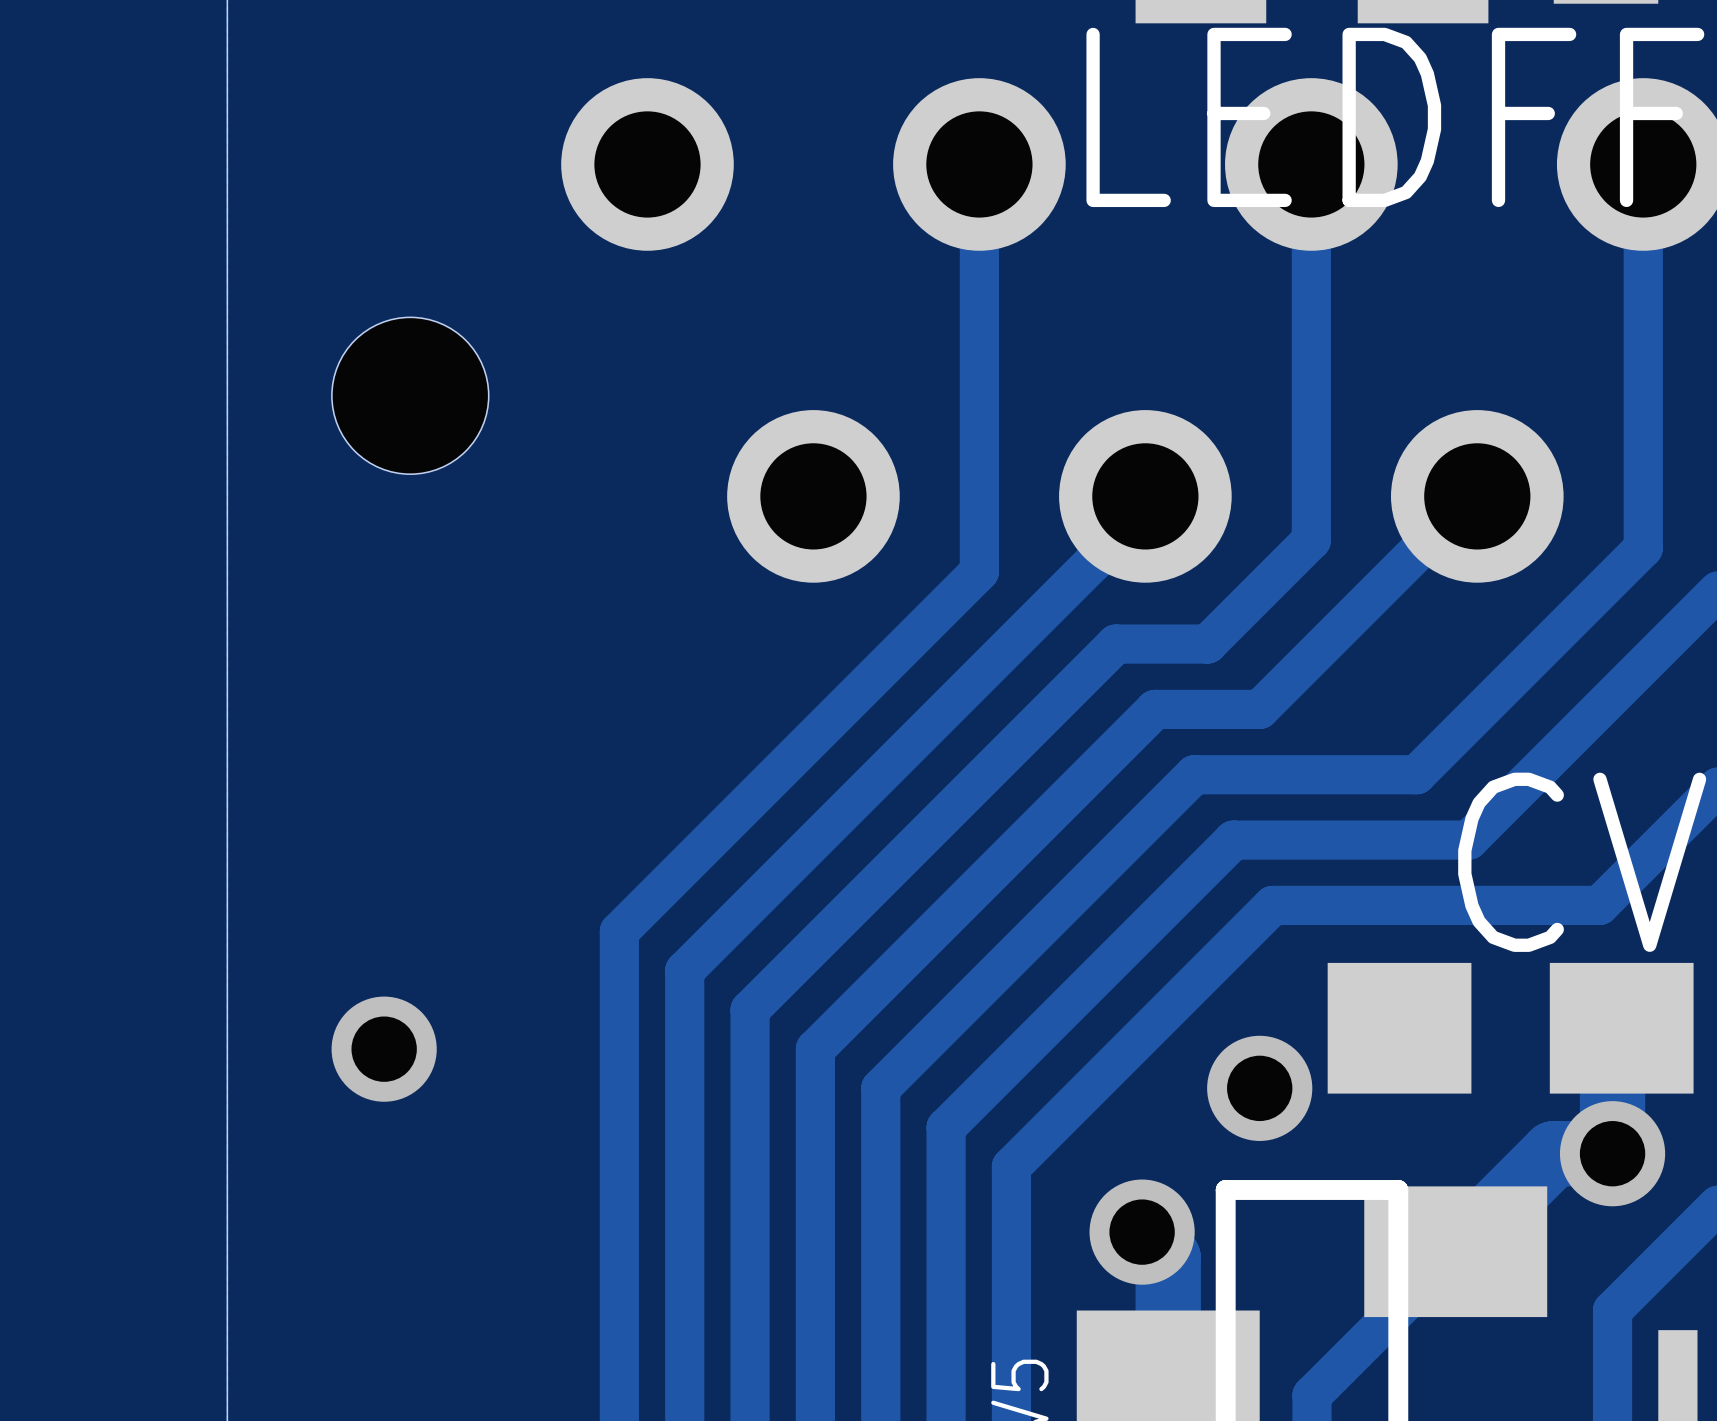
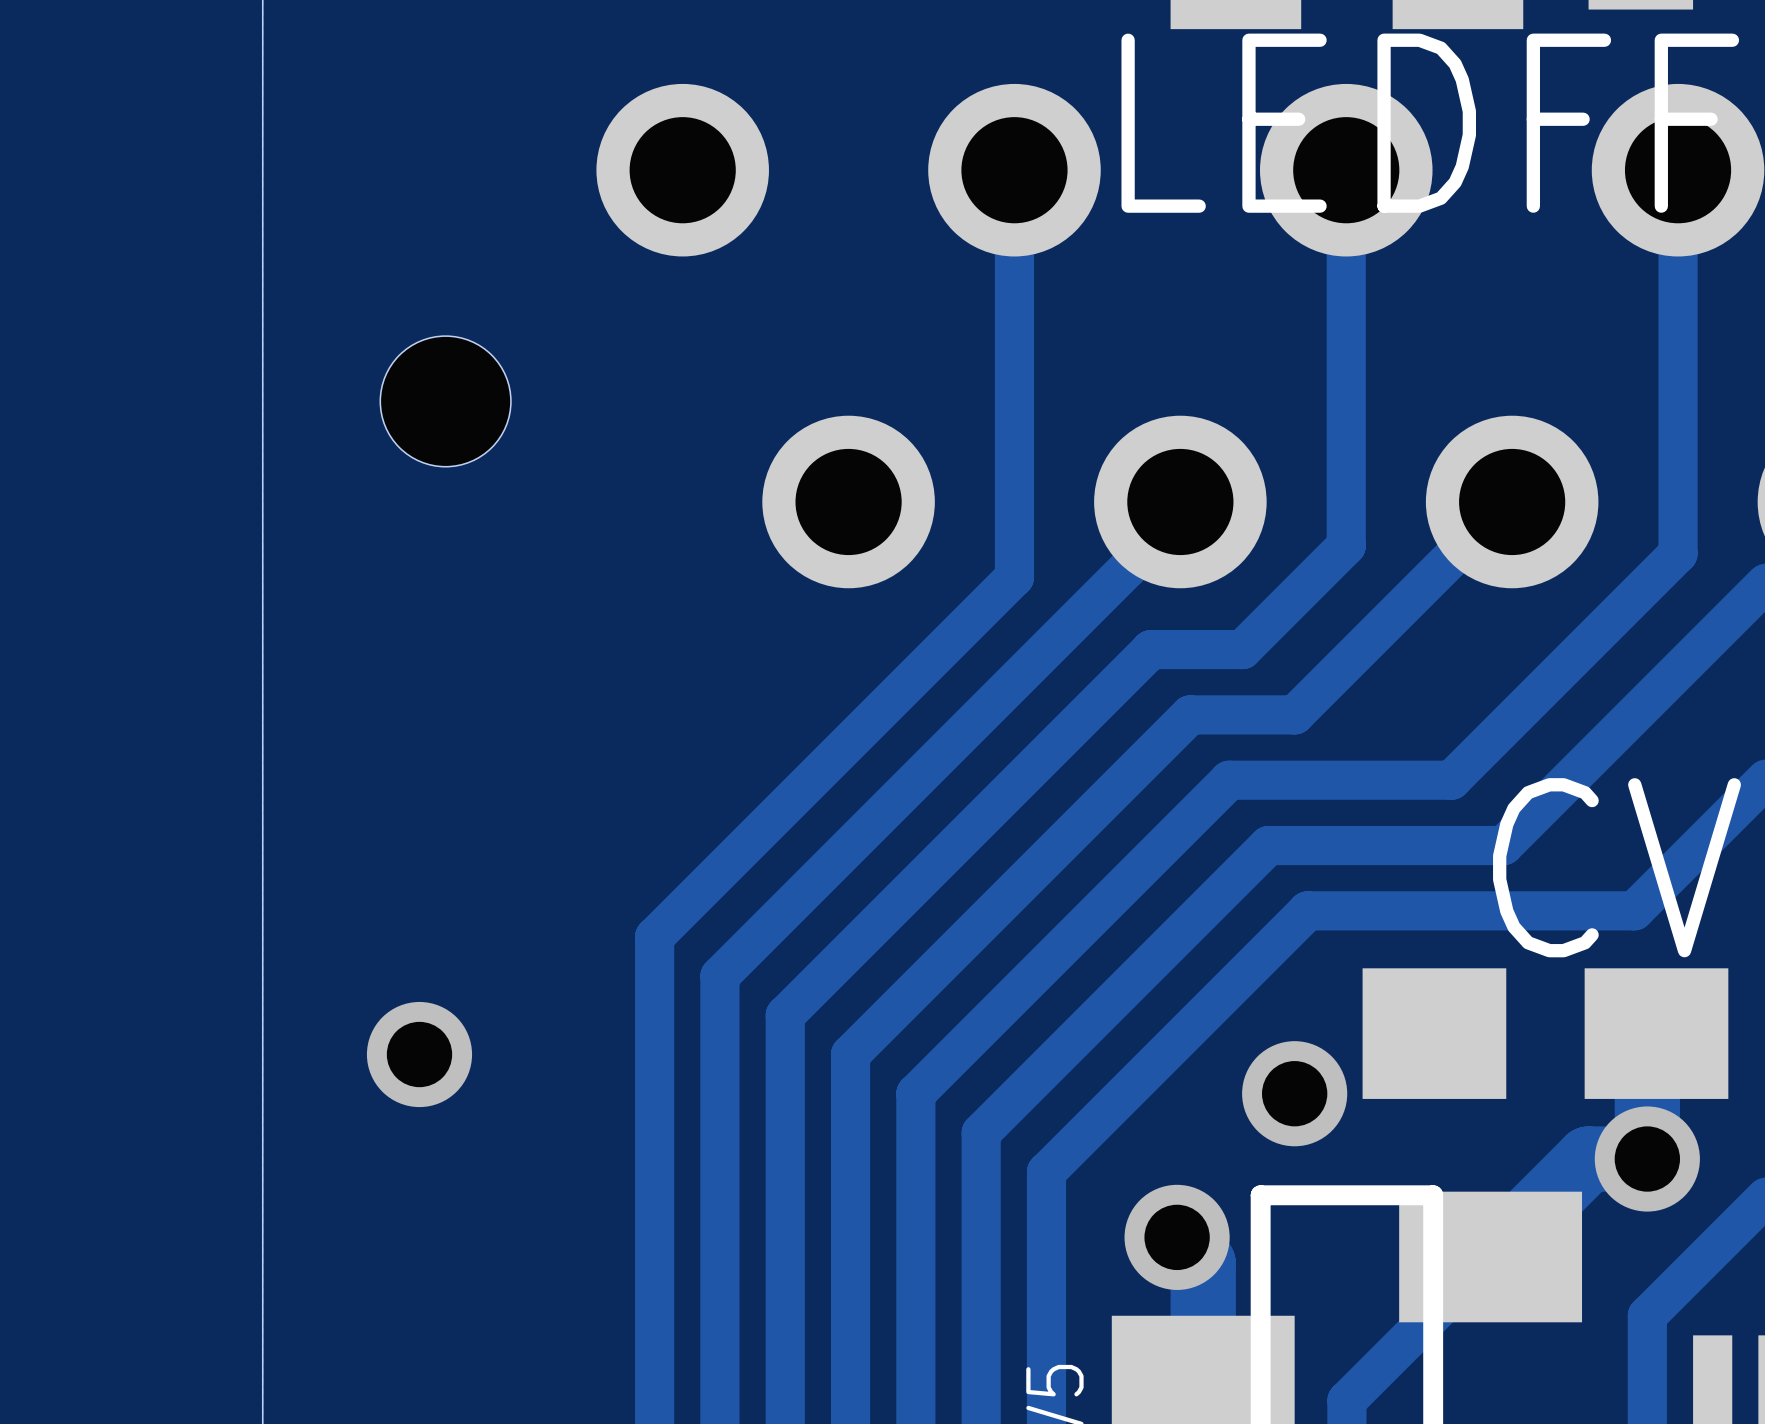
hole size: [331, 317, 489, 475] -> [380, 336, 511, 467]

